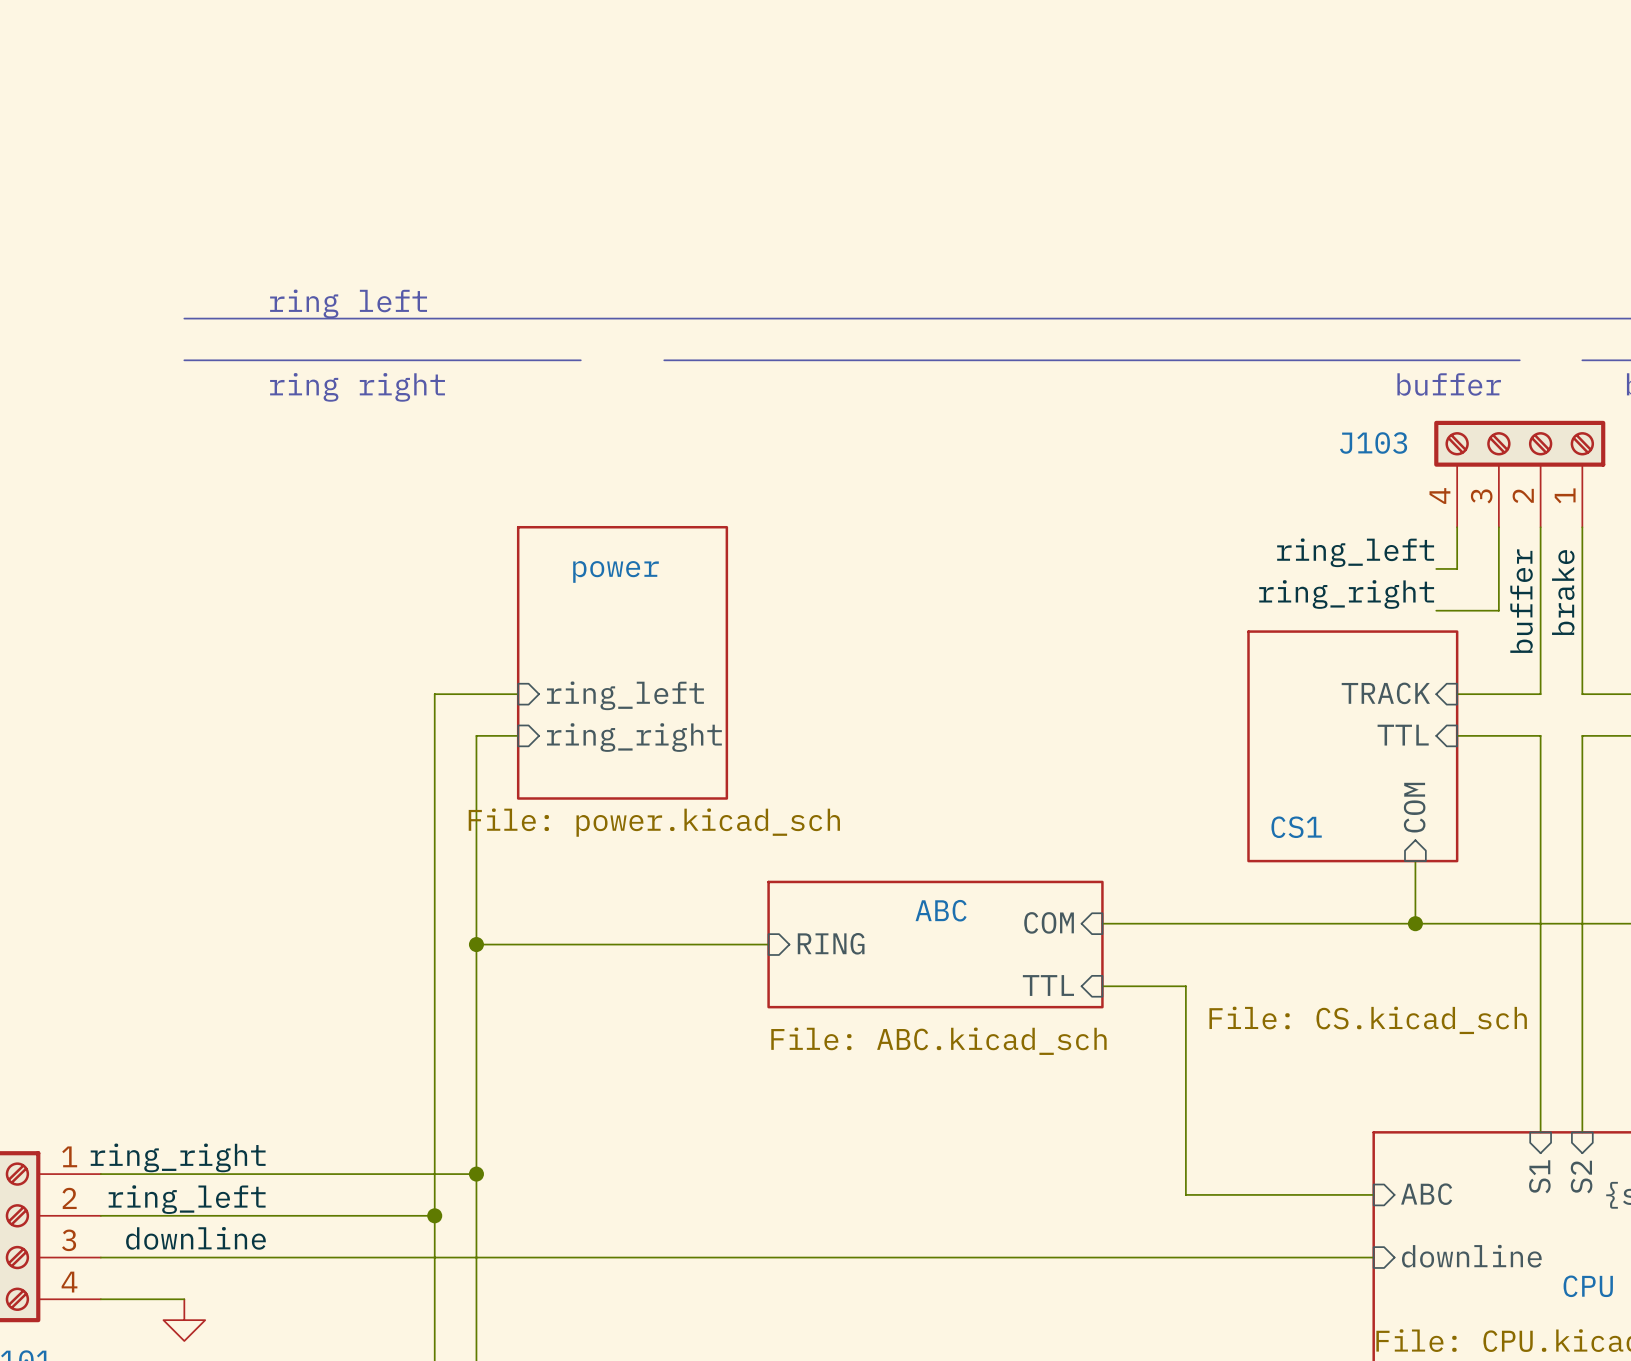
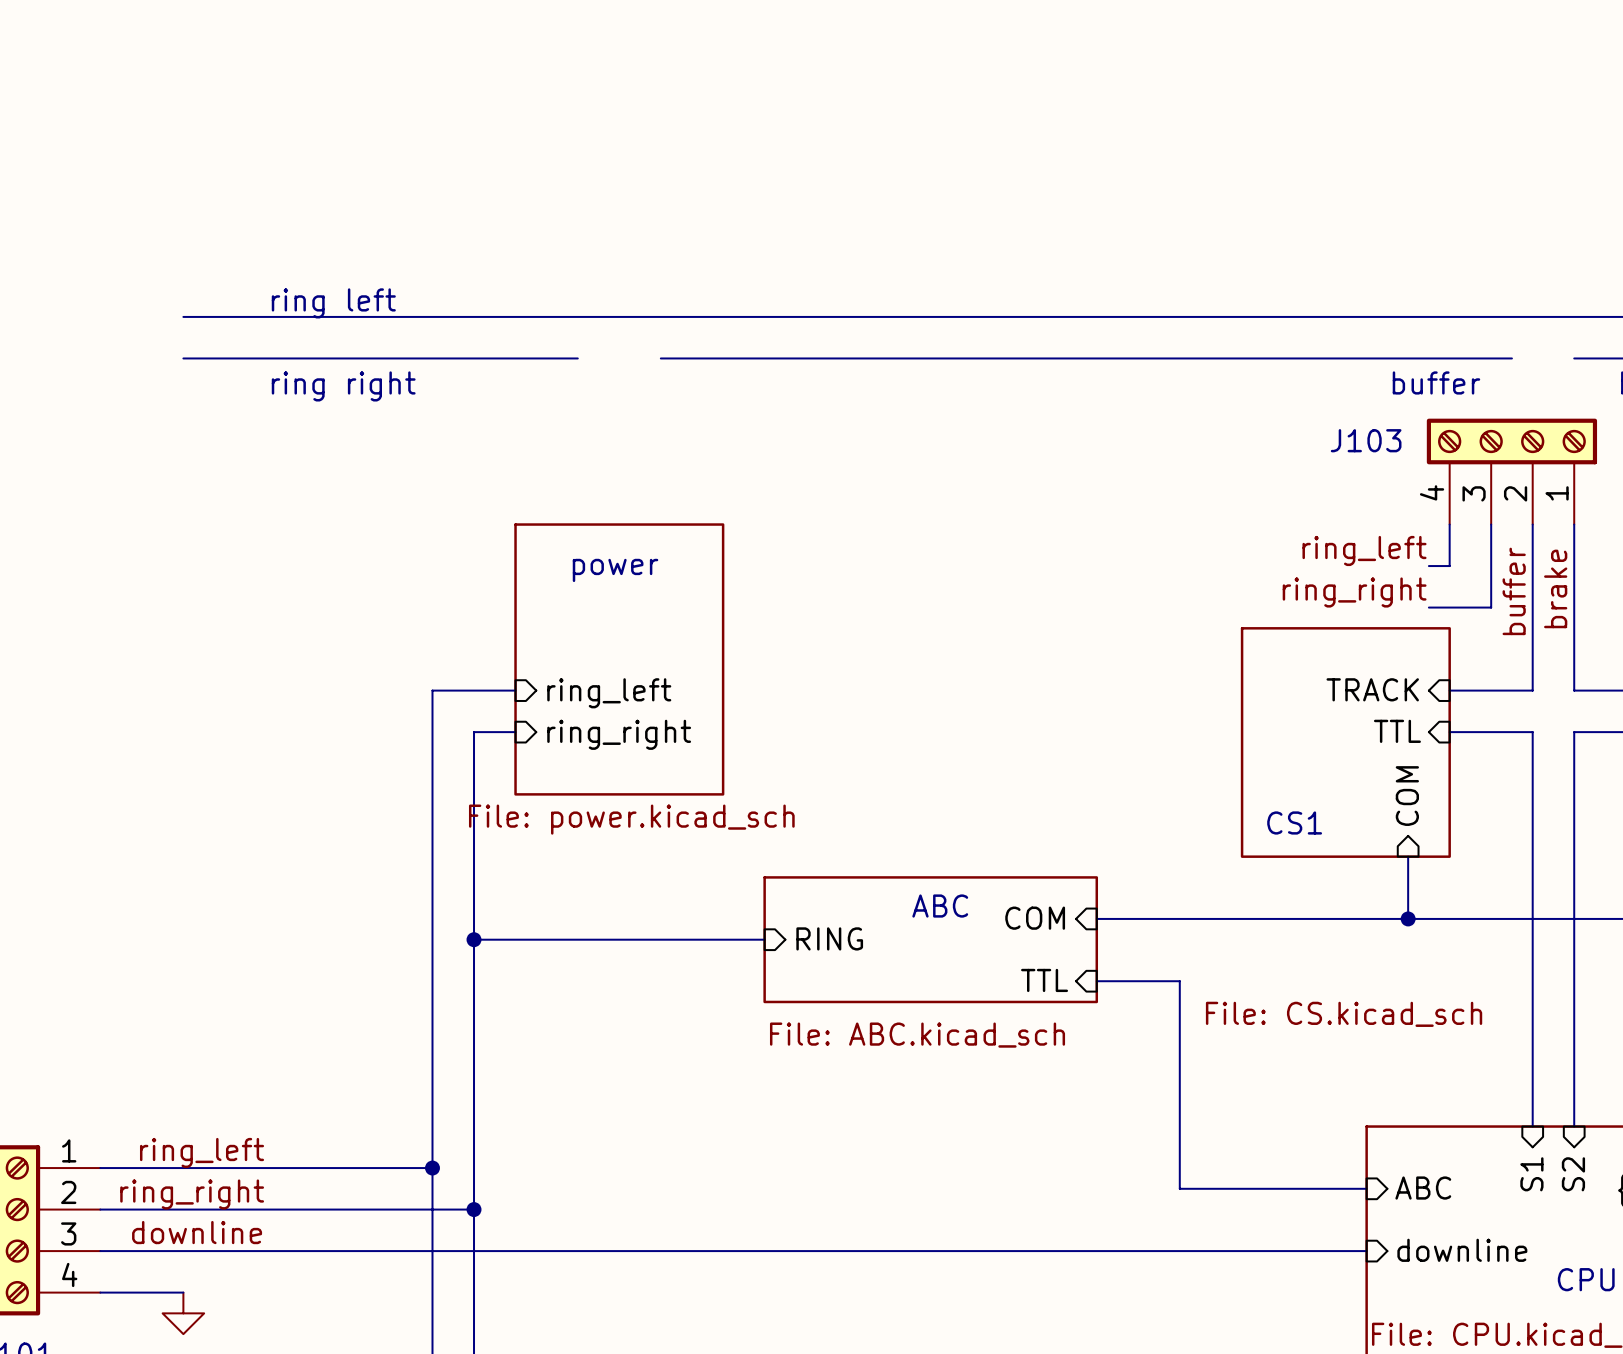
label: ring_right (178, 1157) -> ring_left (202, 1152)
wire: (434, 1174) (476, 1174) -> (432, 1209) (474, 1209)
junction: none -> (432, 1168)
junction: (476, 1174) -> none
label: ring_left (187, 1199) -> ring_right (192, 1194)
junction: (434, 1215) -> none
junction: none -> (474, 1209)

